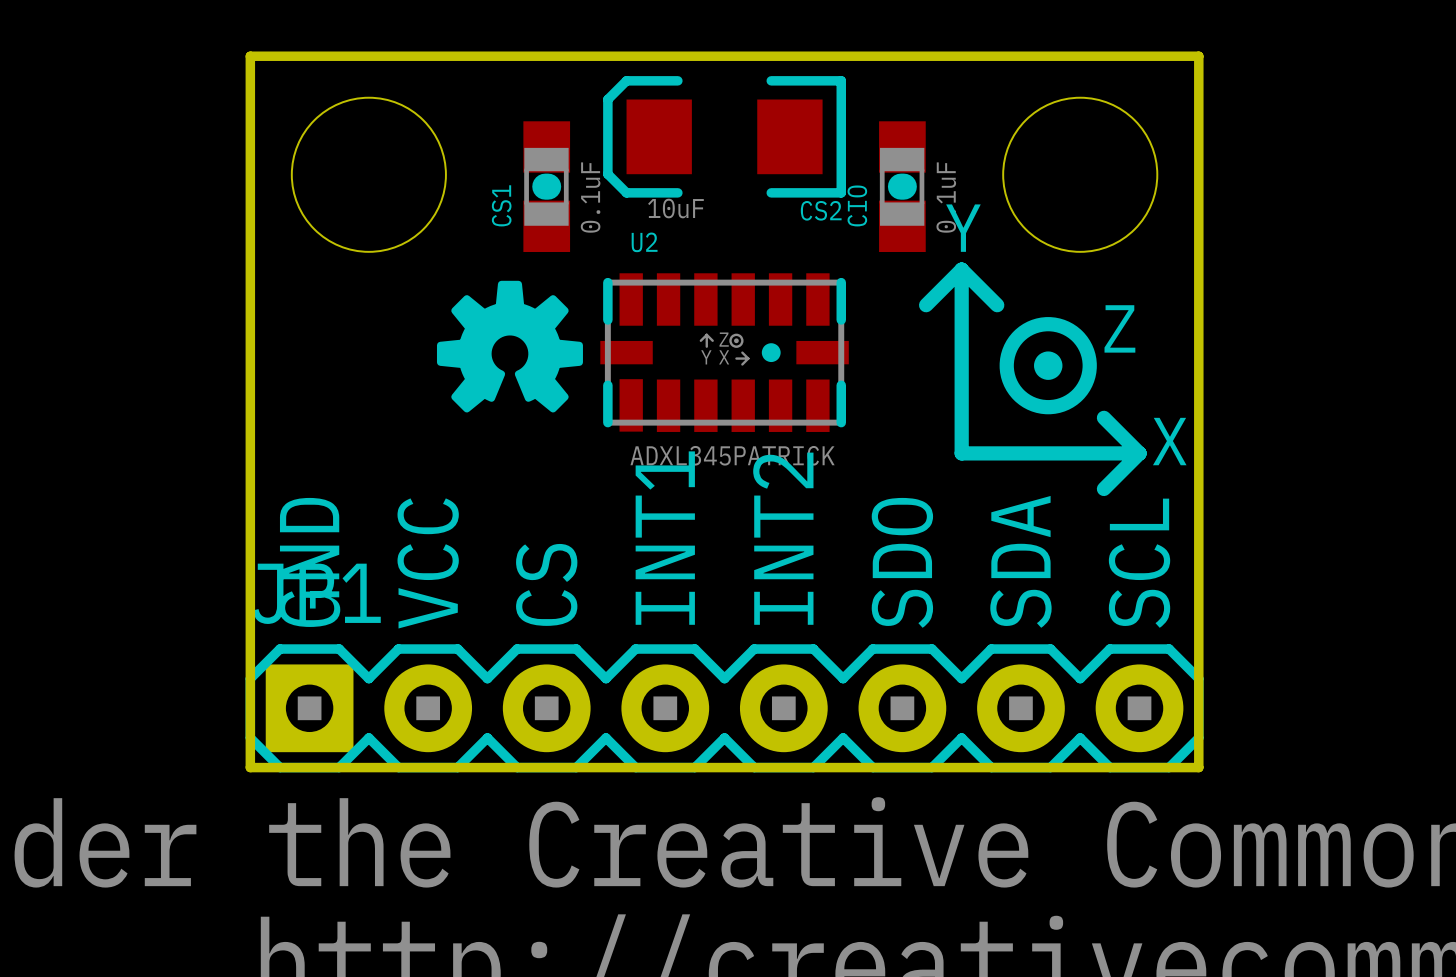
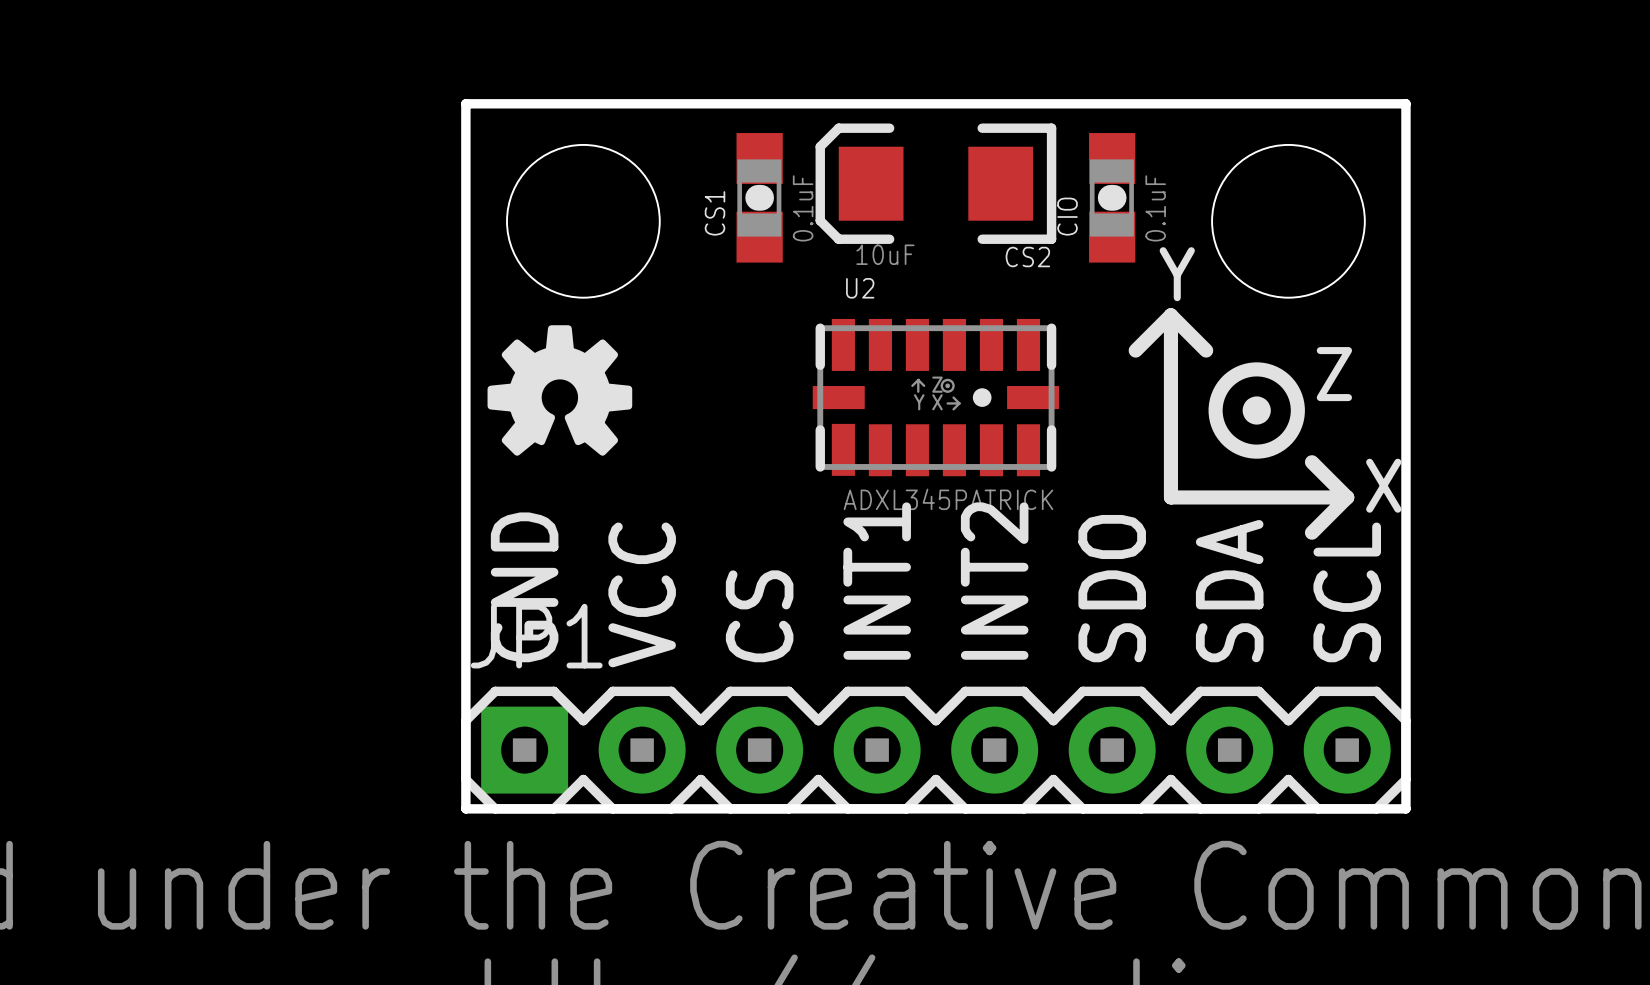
CS1 position: (546, 186) -> (759, 197)
CIO position: (902, 186) -> (1112, 197)
drawing position: (509, 346) -> (559, 390)

